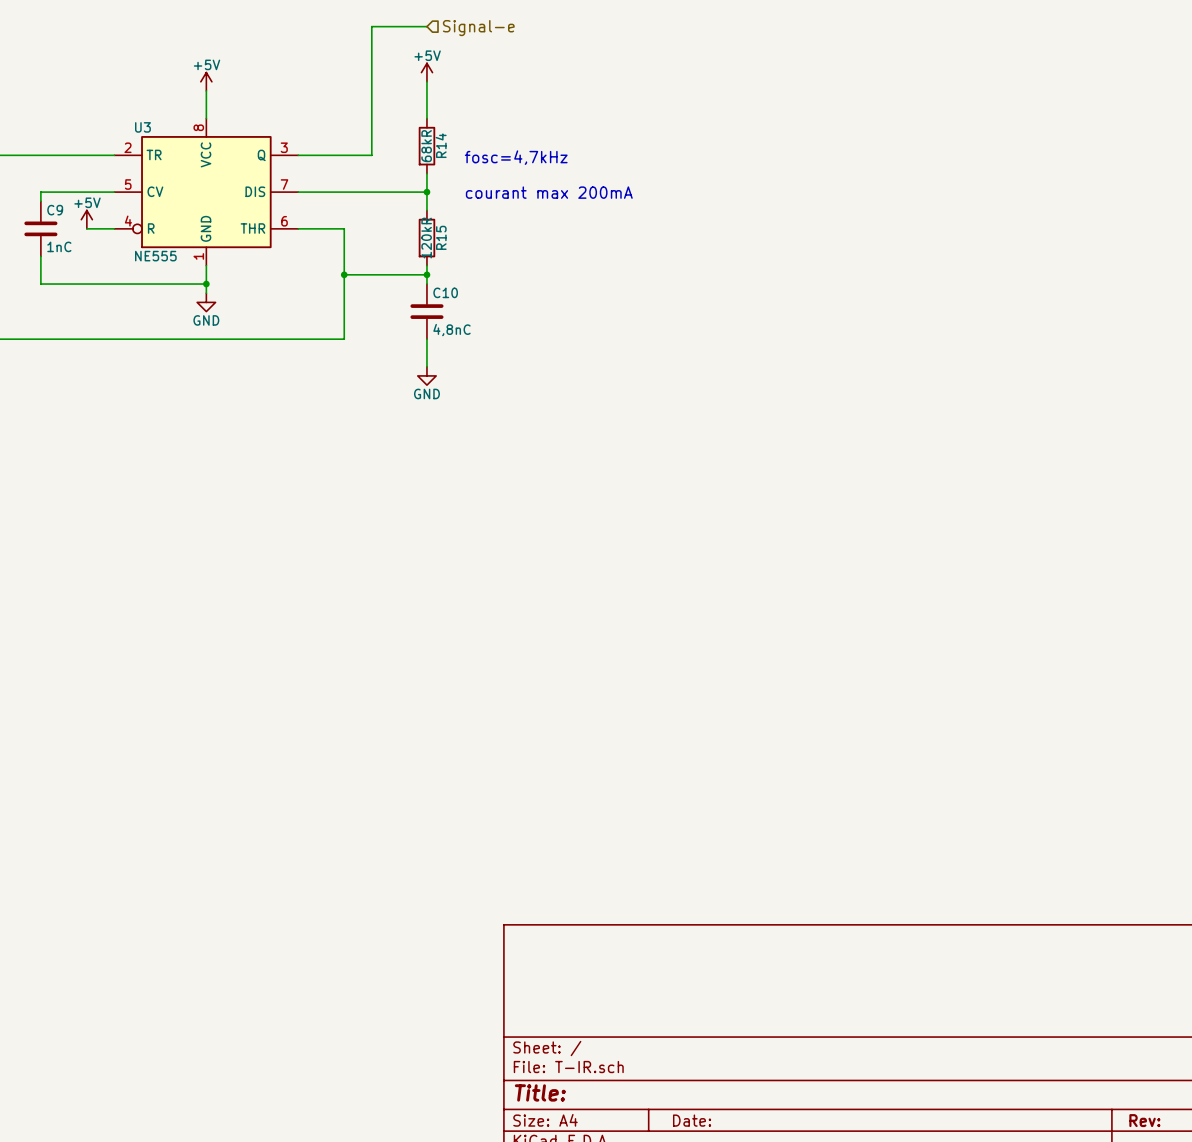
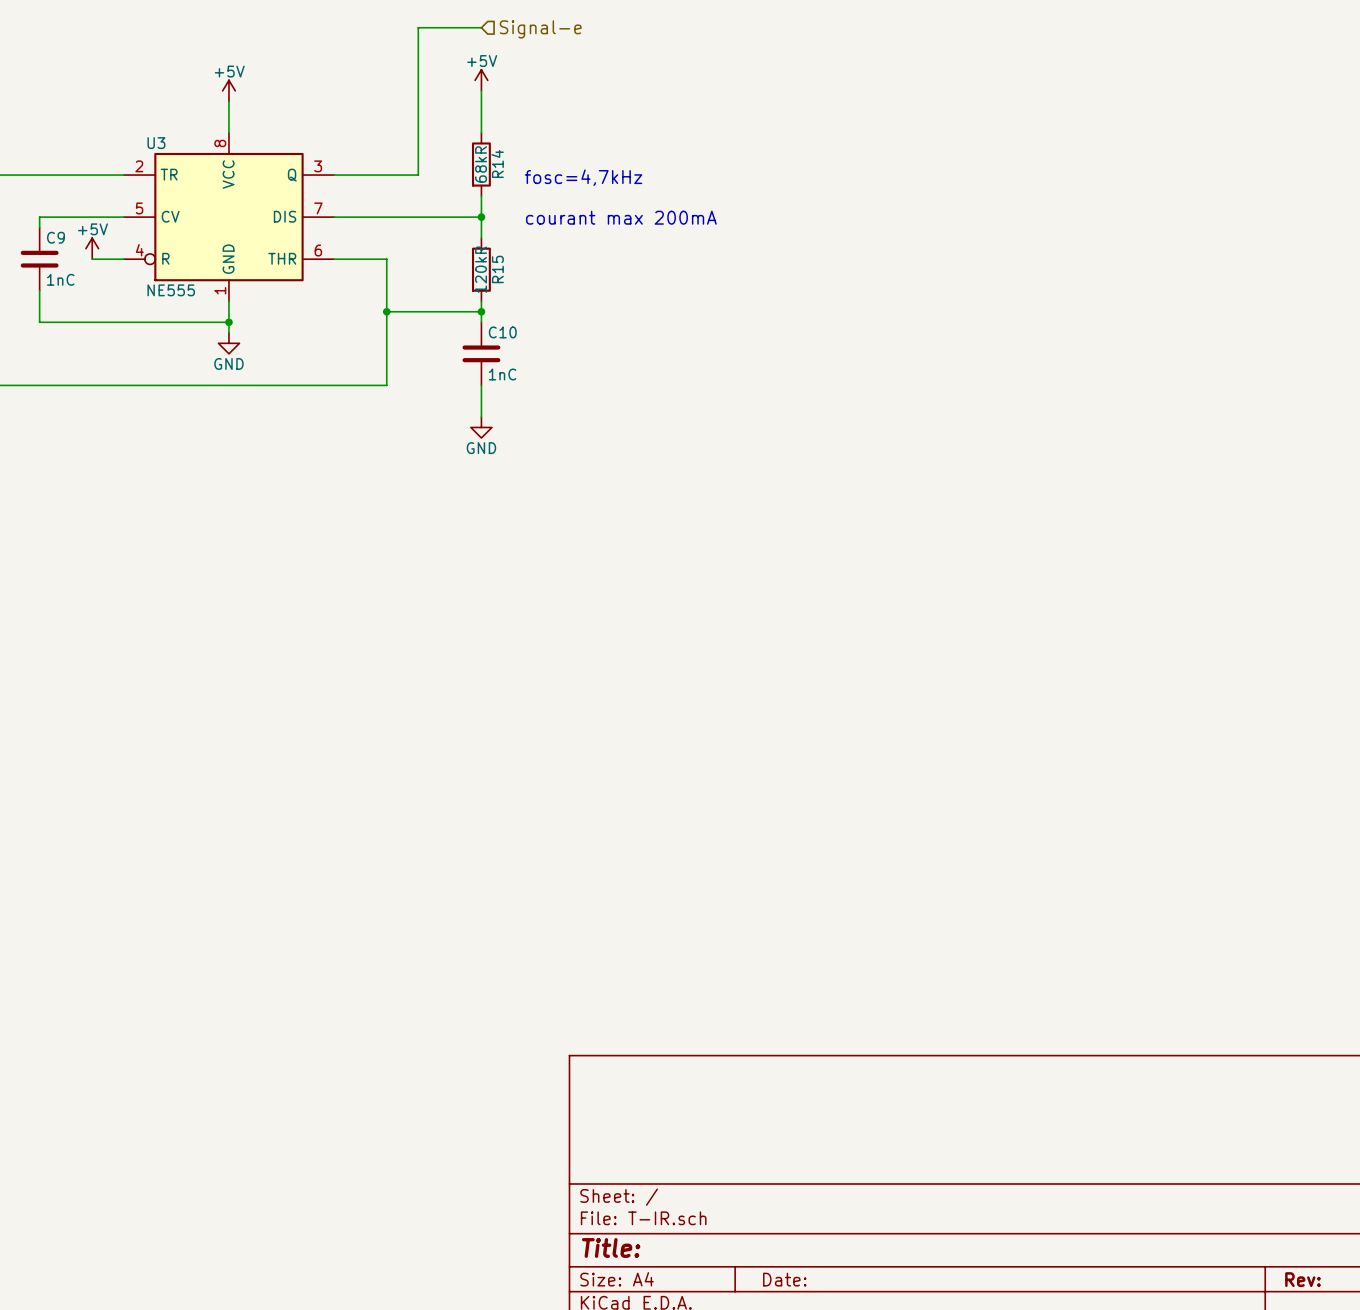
C10 value: 4,8nC (451, 330) -> 1nC (502, 374)

